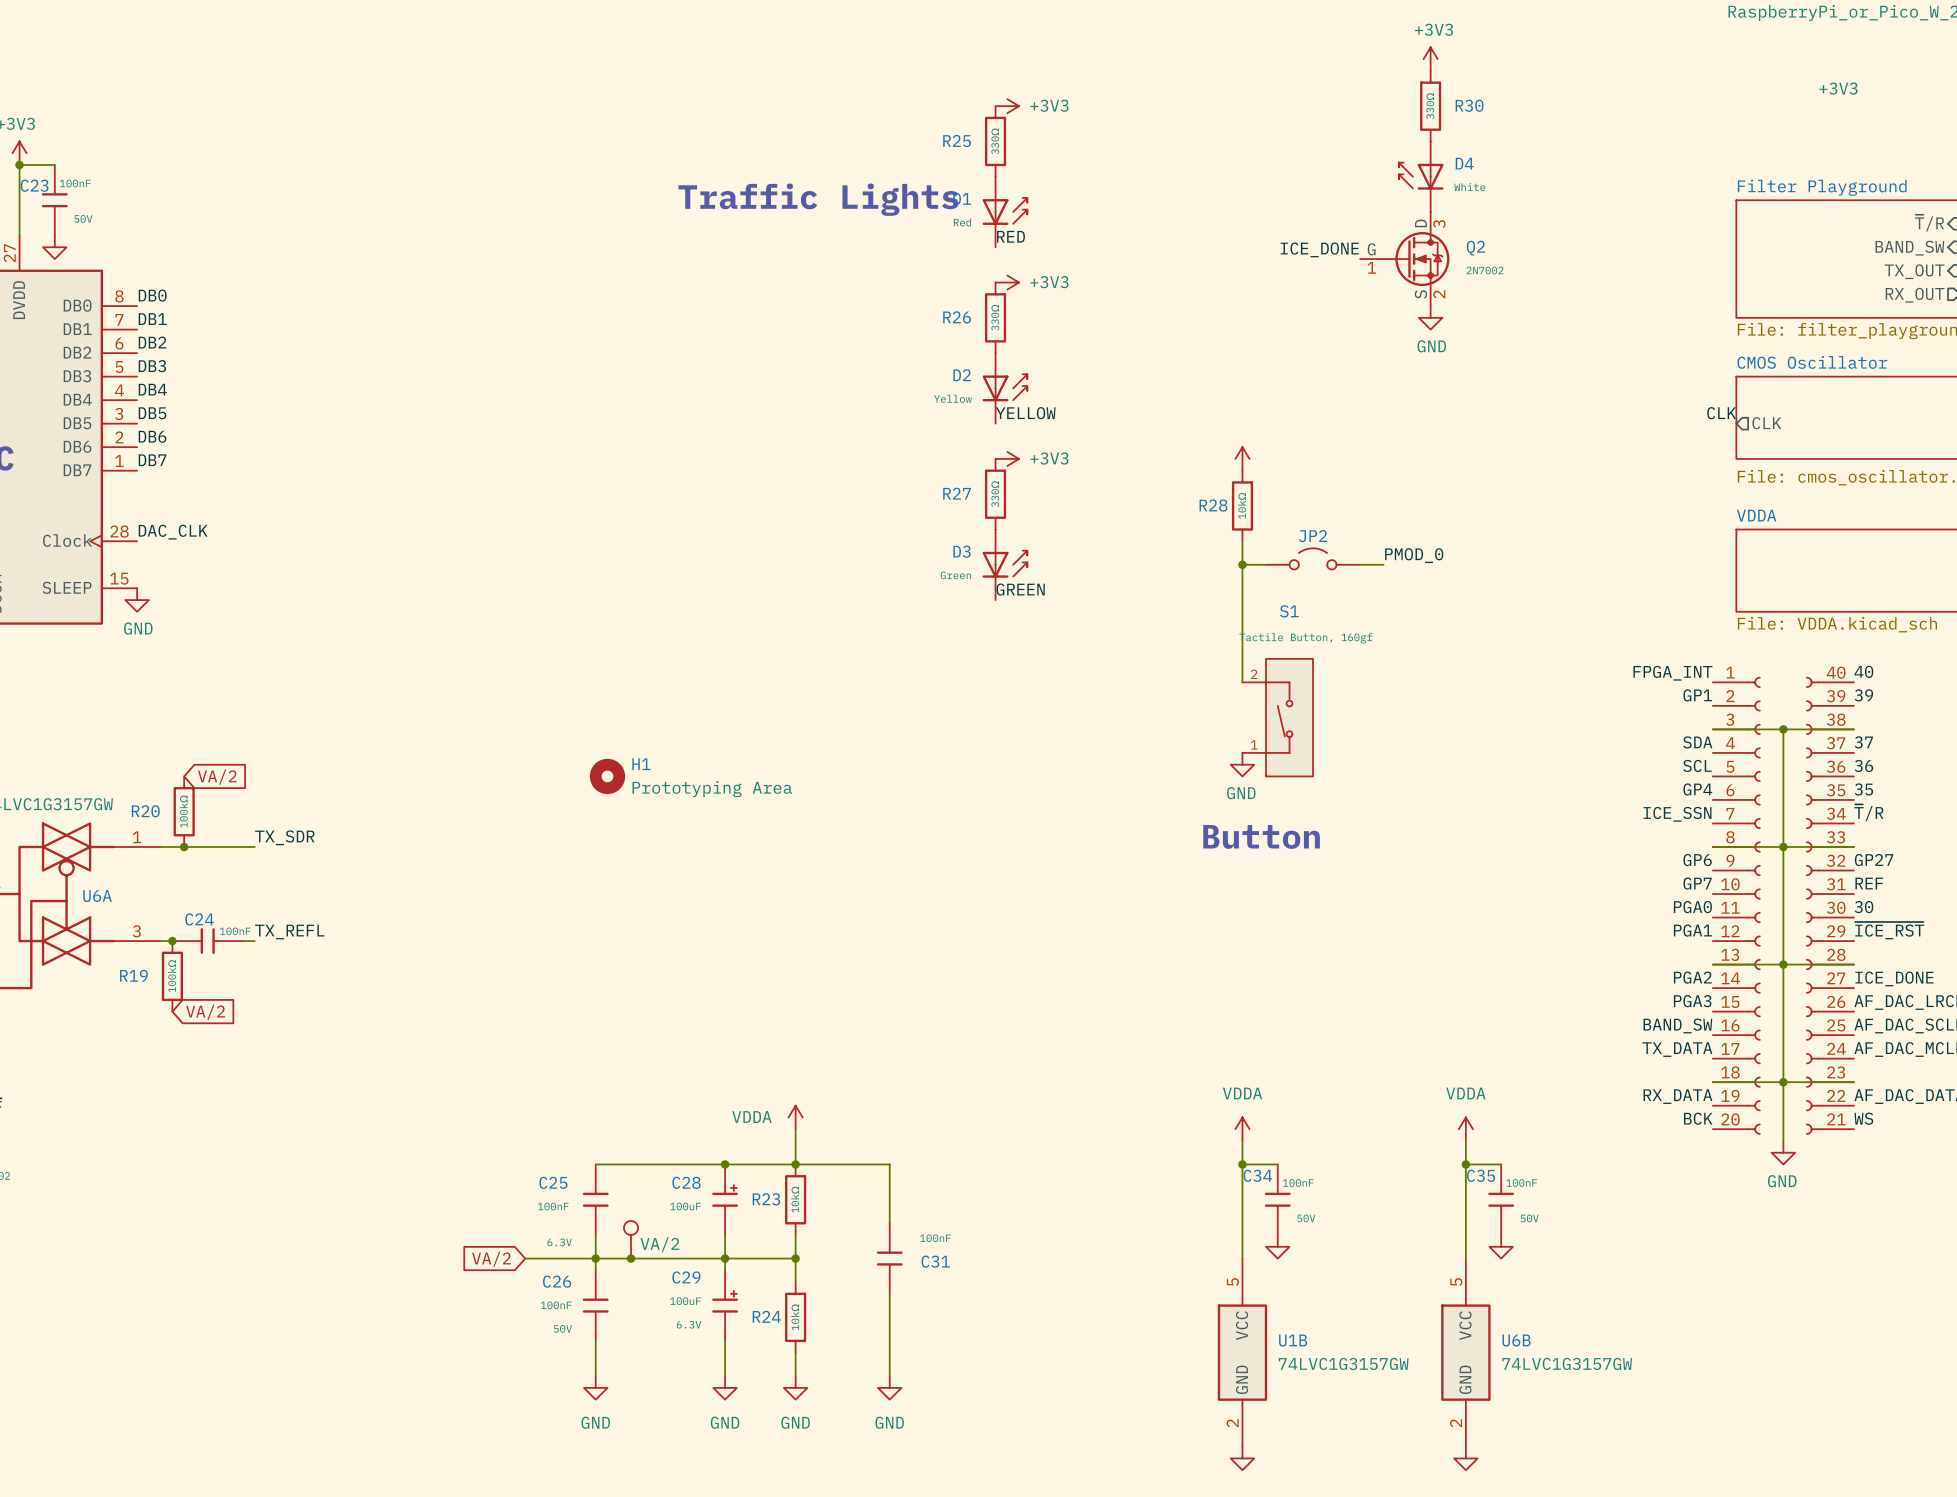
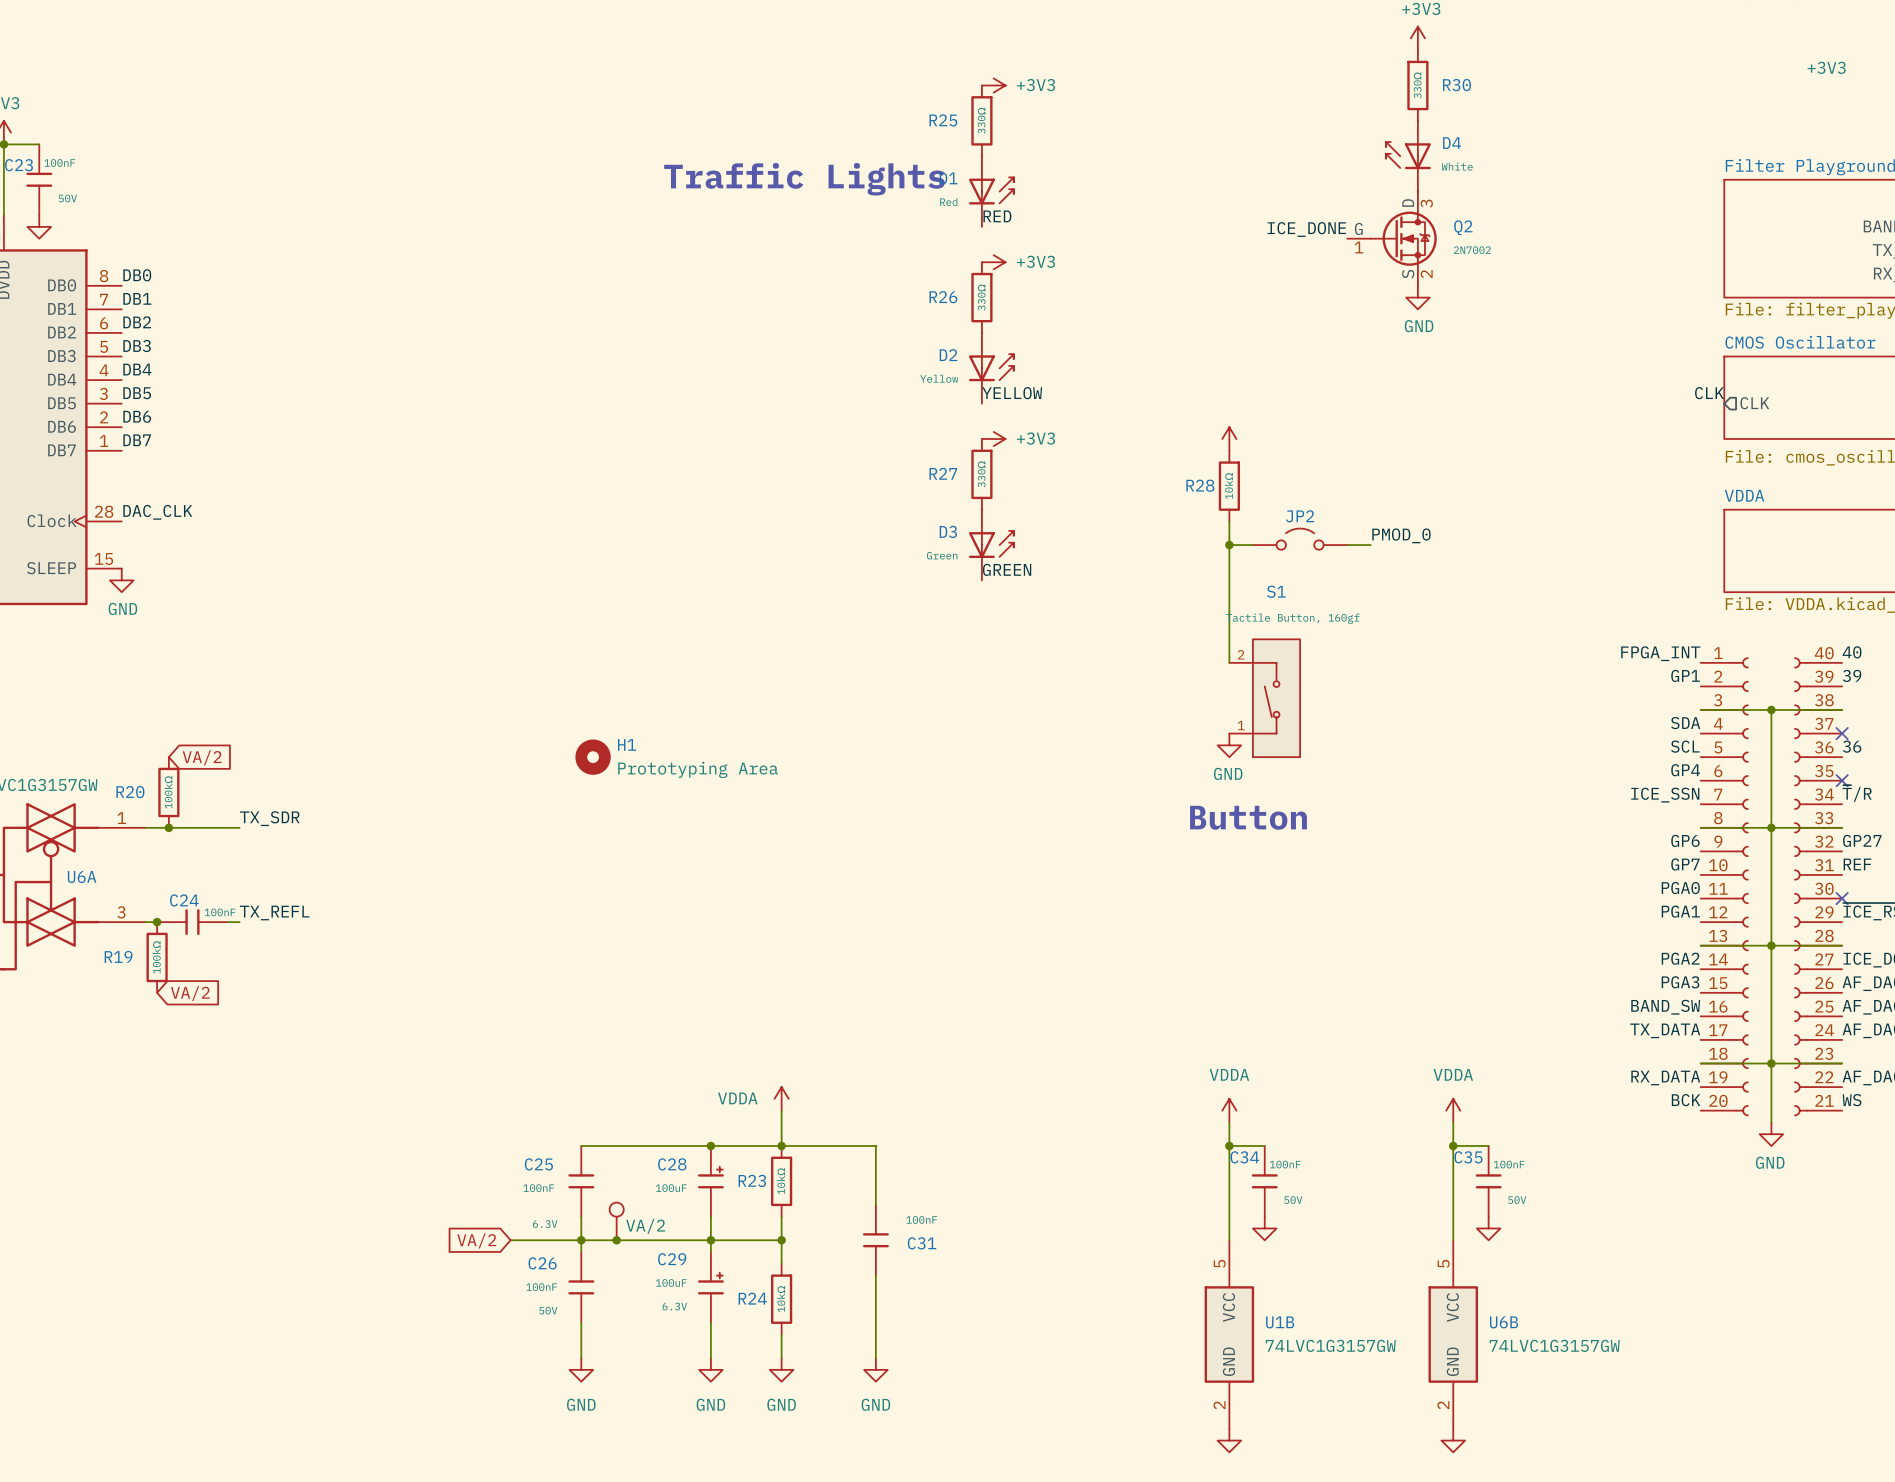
label: 37 (1863, 742) -> none
no-connect mark: none -> (1842, 733)
label: 35 (1863, 789) -> none
no-connect mark: none -> (1842, 780)
label: 30 (1863, 907) -> none
no-connect mark: none -> (1842, 898)

